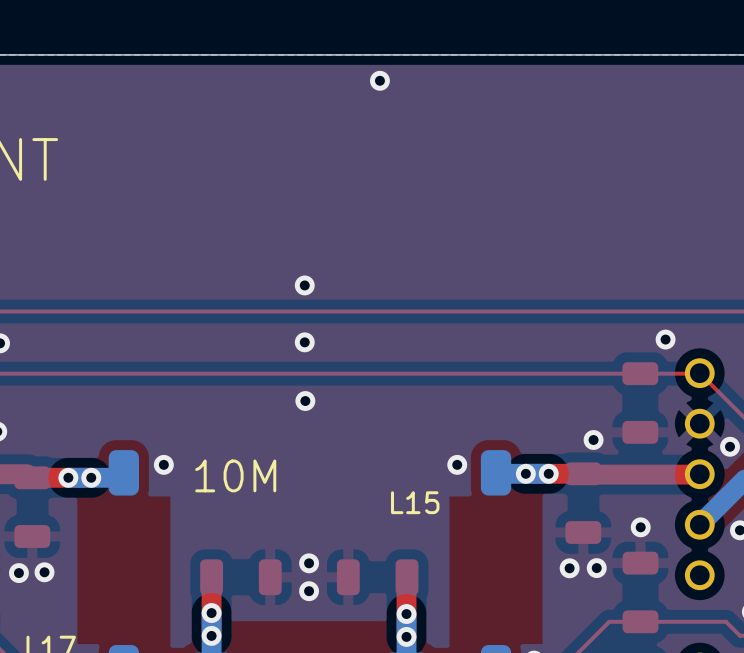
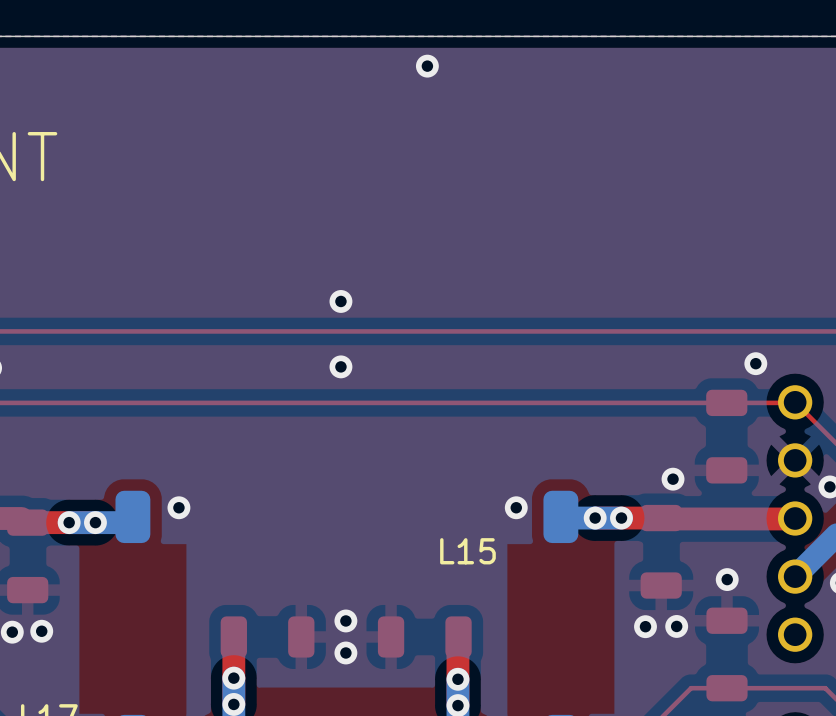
via: (305, 401) -> none
text: 10M (235, 475) -> none

